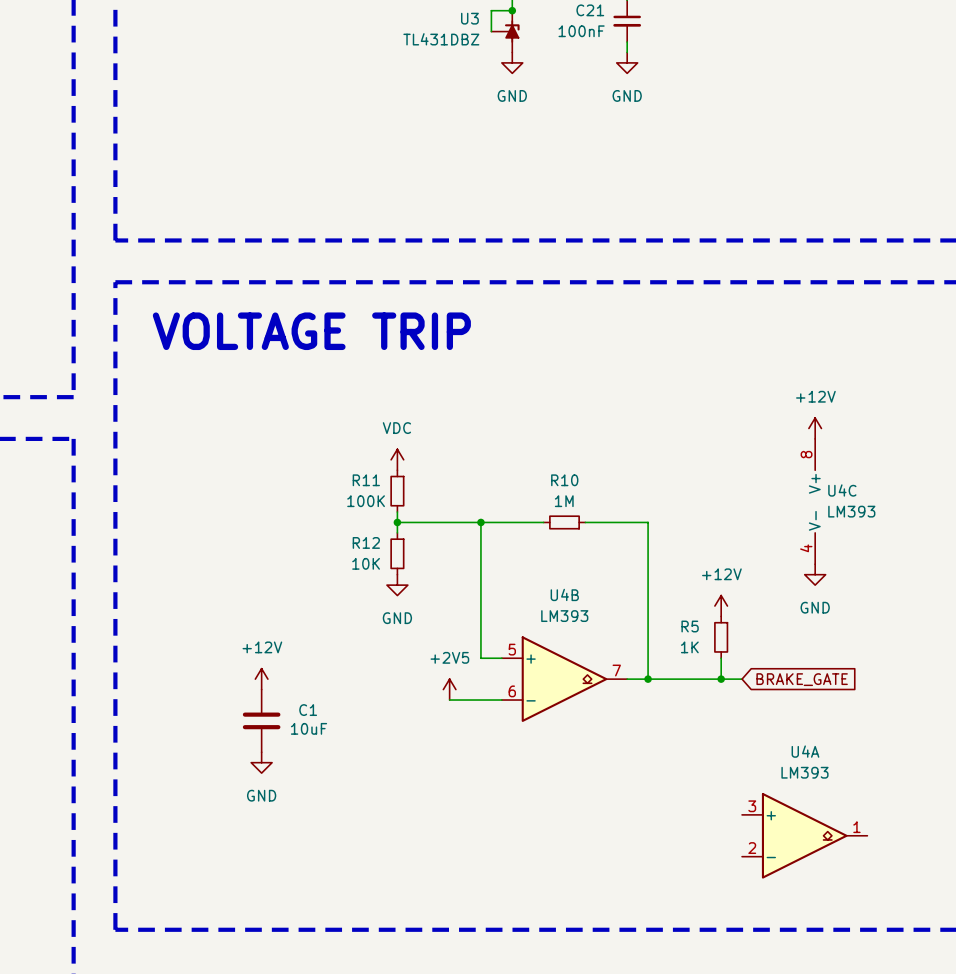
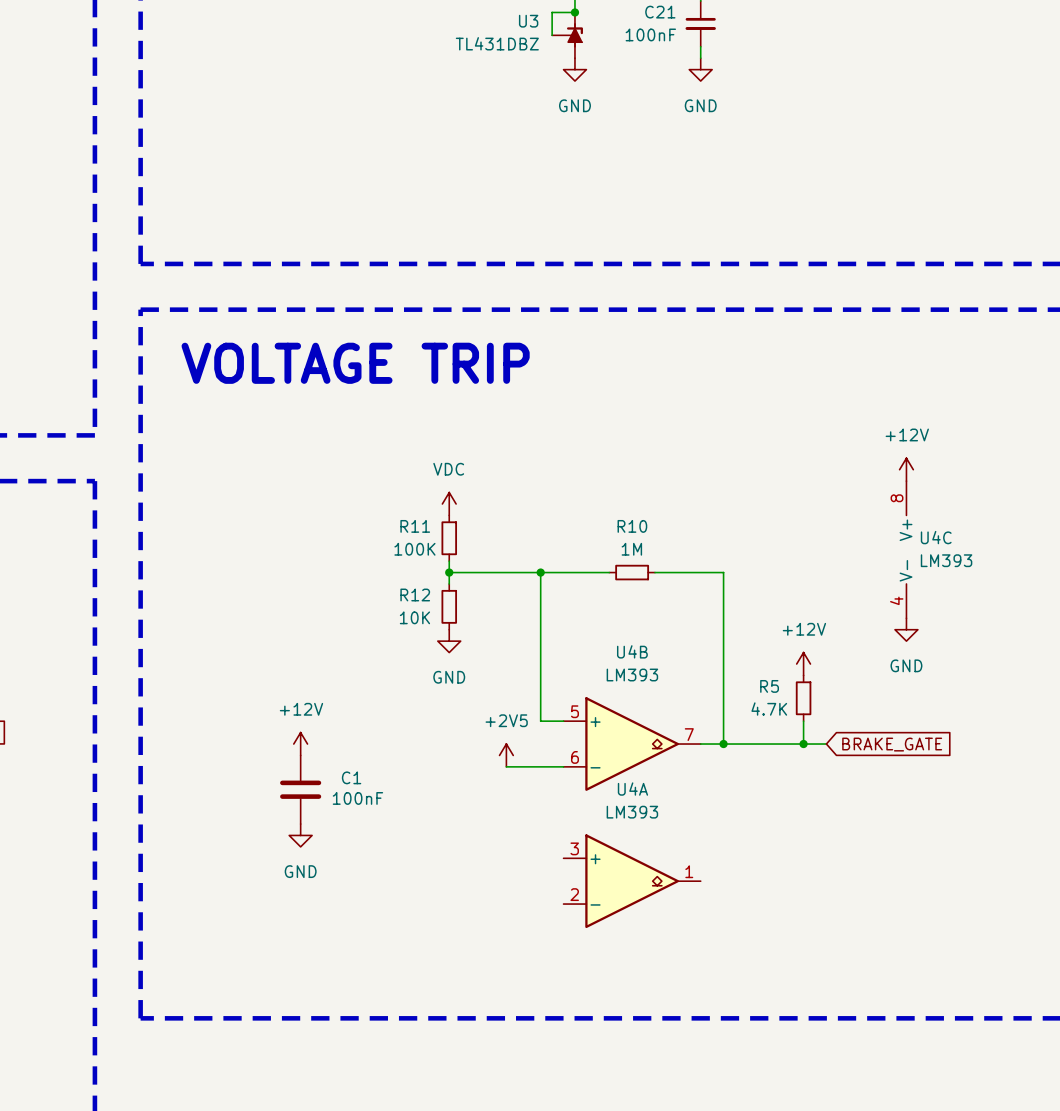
R5 value: 1K (689, 647) -> 4.7K (769, 709)
C1 value: 10uF (309, 728) -> 100nF (357, 798)
U4A position: (804, 835) -> (632, 881)

